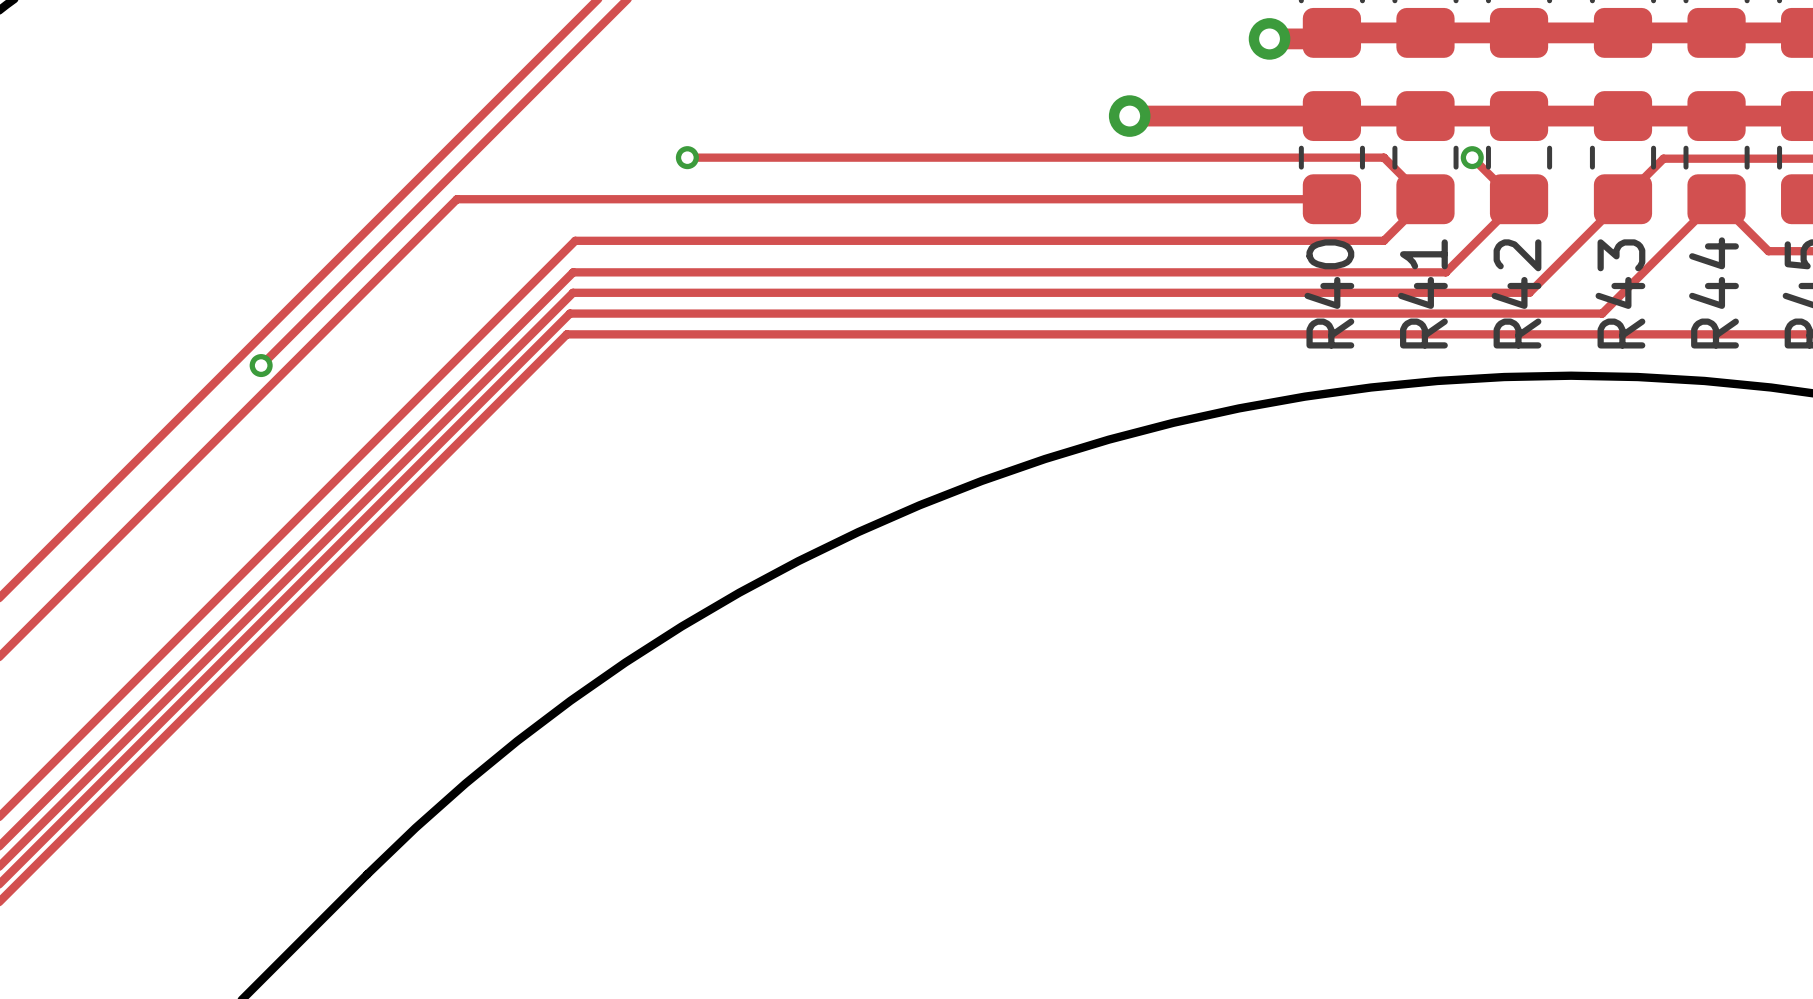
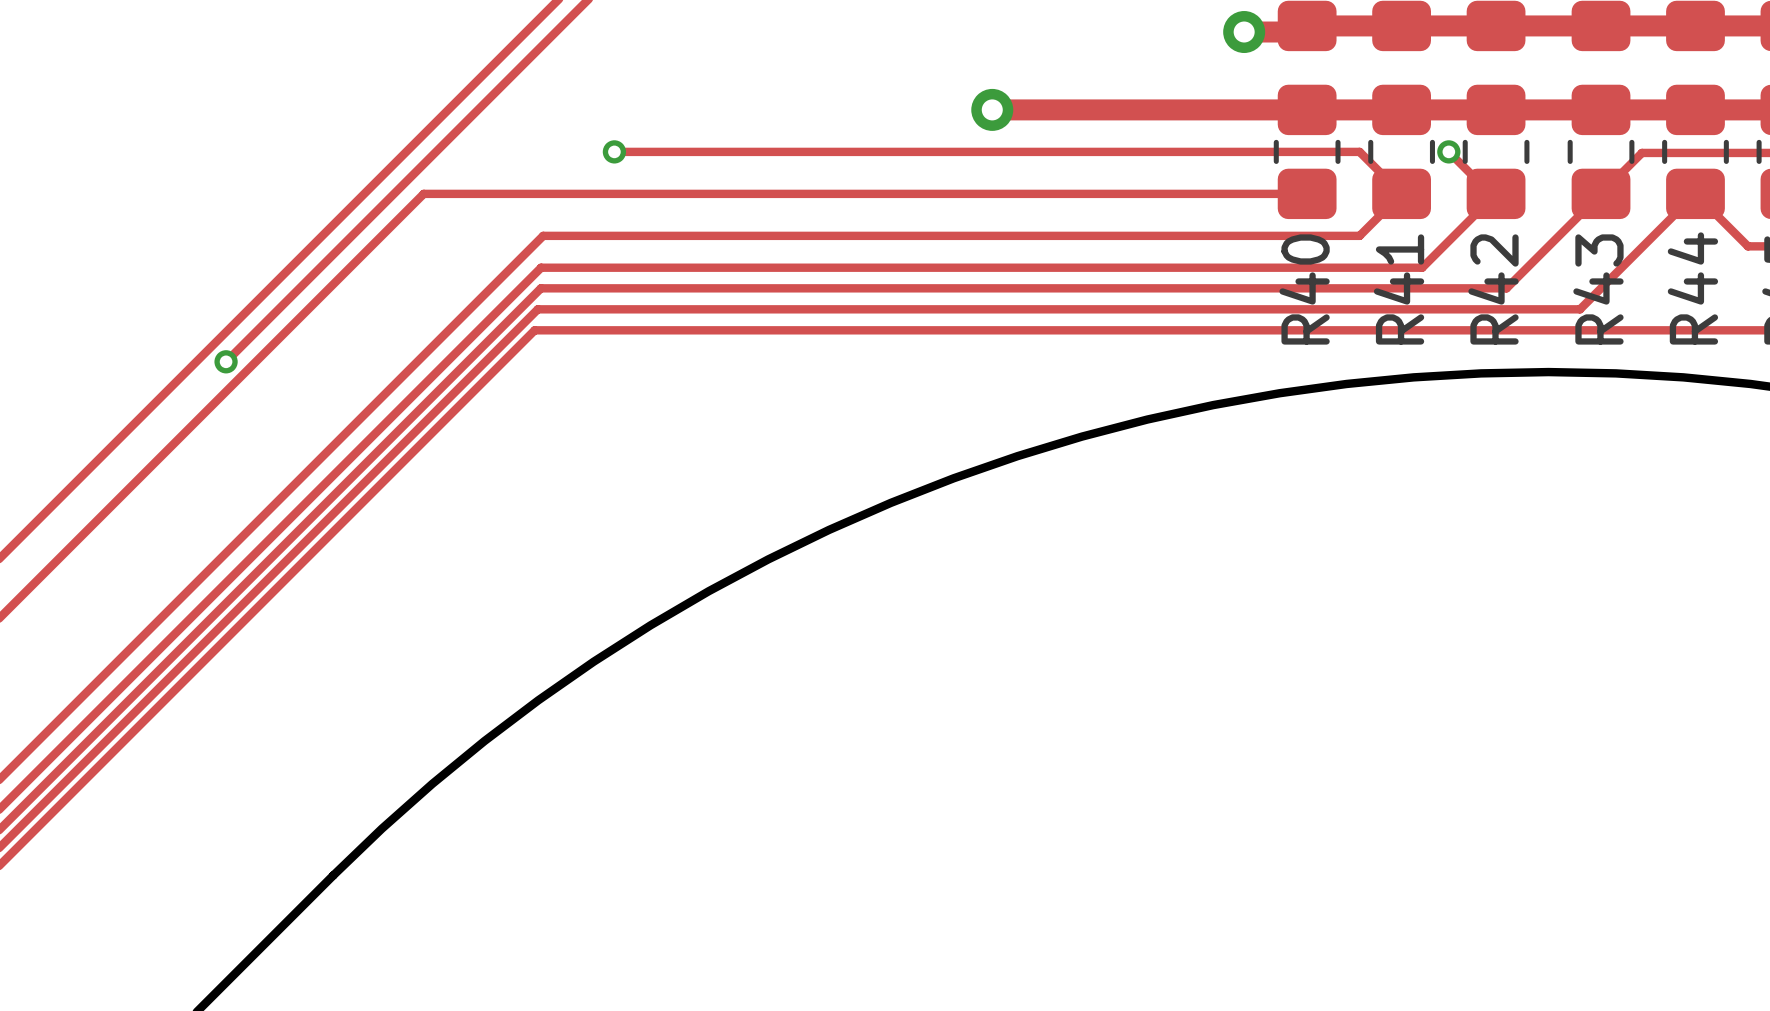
track: none -> (992, 109) (1102, 109)
via position: (1129, 116) -> (992, 109)
track: none -> (614, 151) (656, 151)
via position: (687, 157) -> (614, 151)

